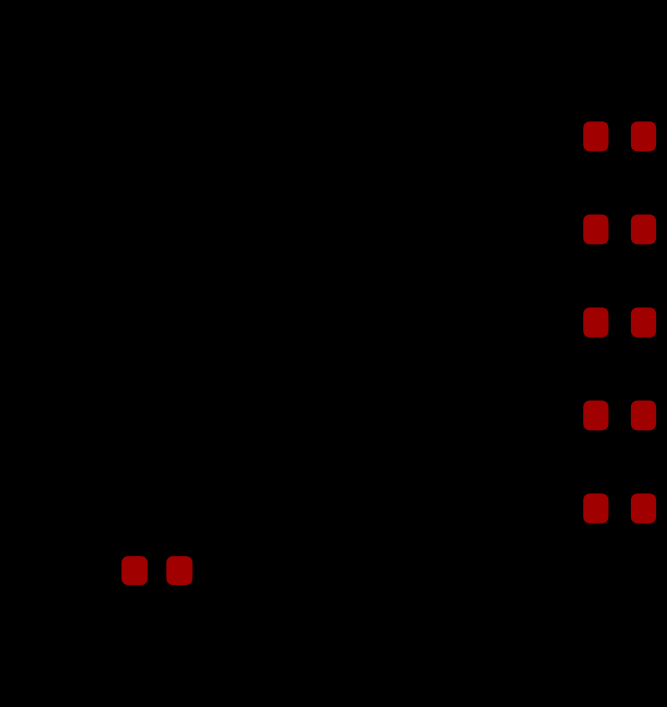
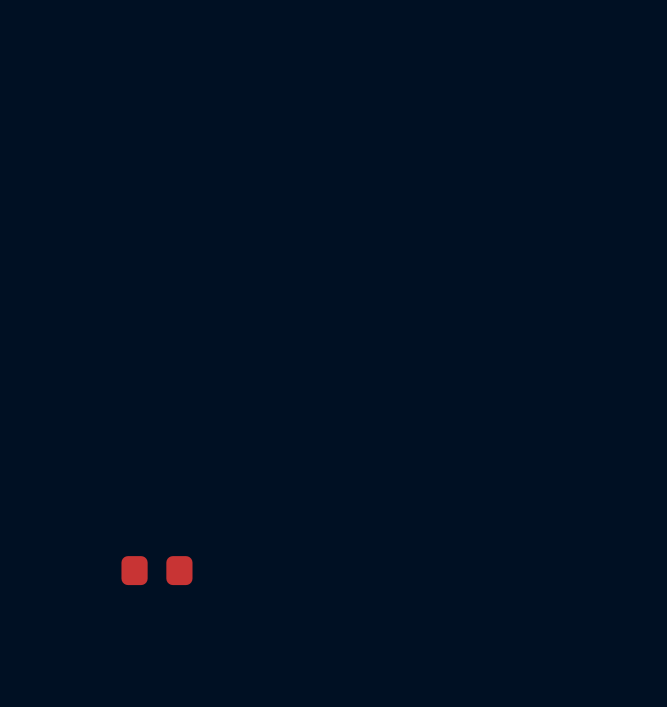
part: (619, 136) -> none
part: (619, 229) -> none
part: (619, 322) -> none
part: (619, 415) -> none
part: (619, 508) -> none

